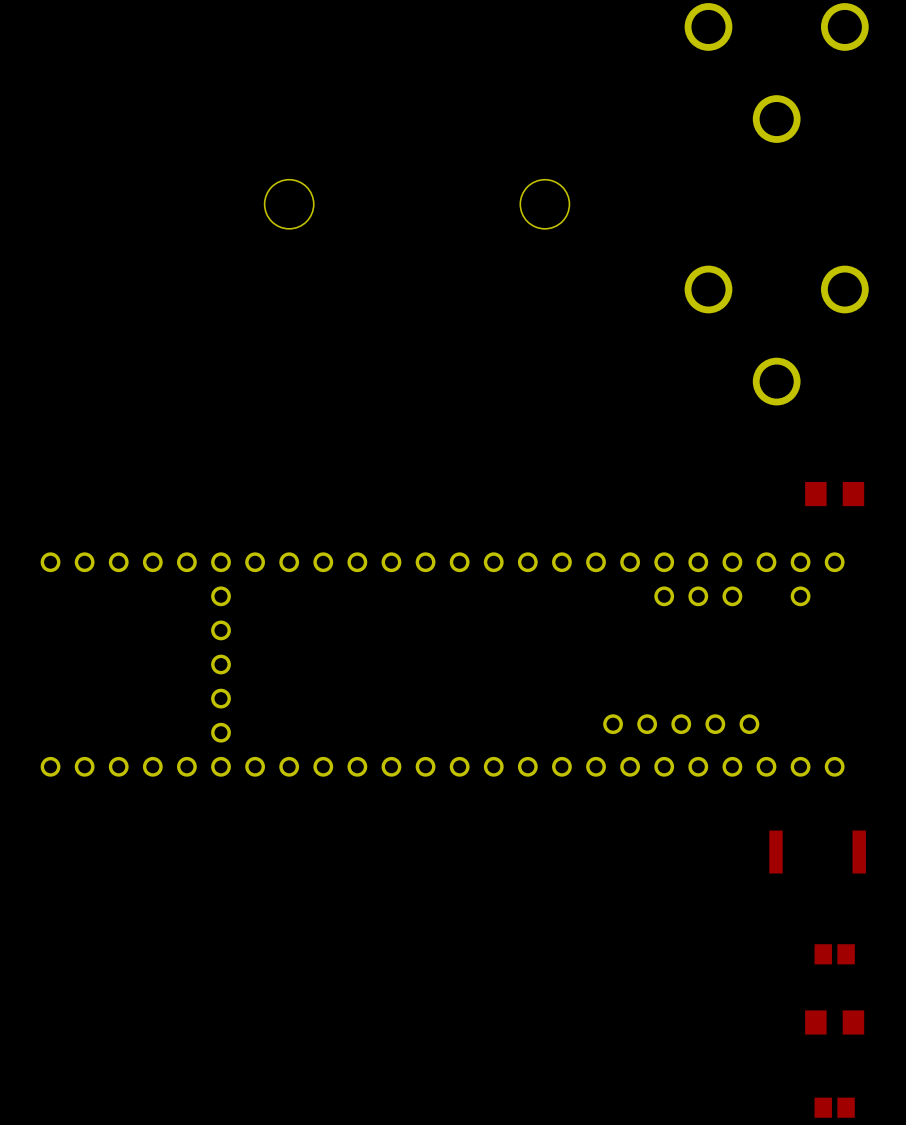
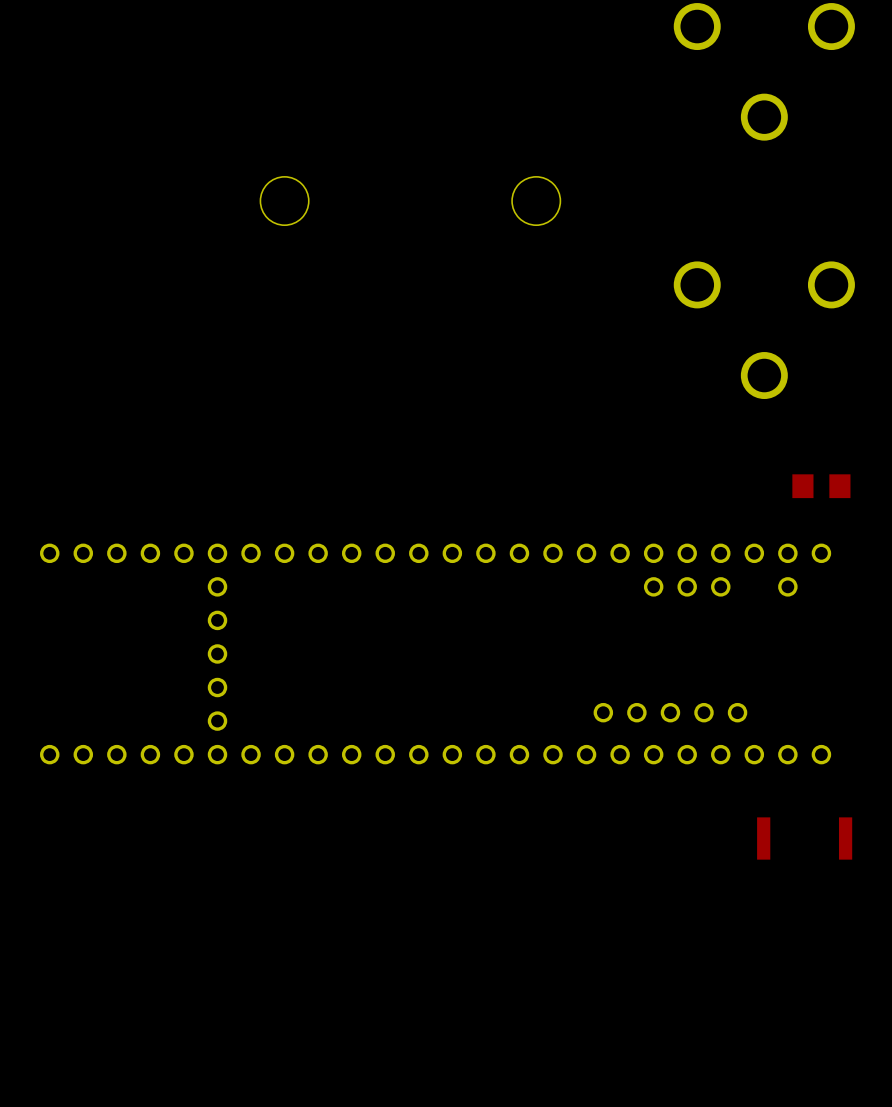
part: (834, 954) -> none
part: (834, 1022) -> none
part: (834, 1107) -> none

